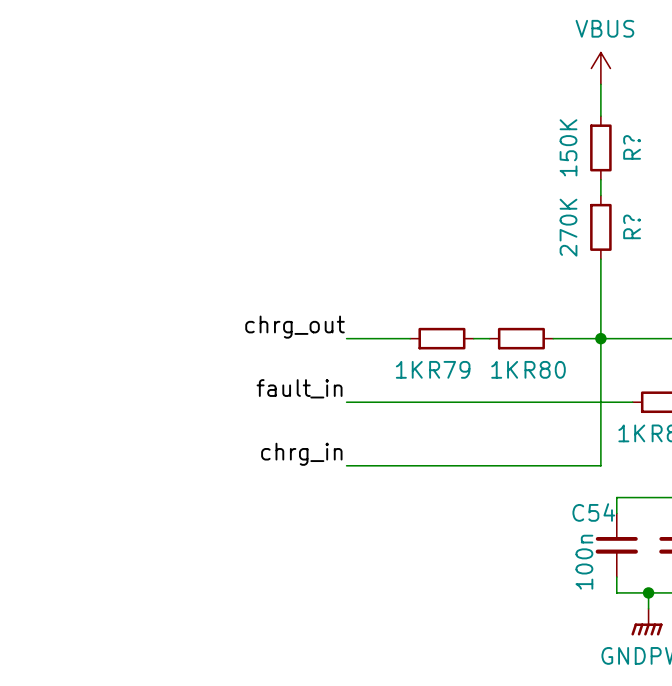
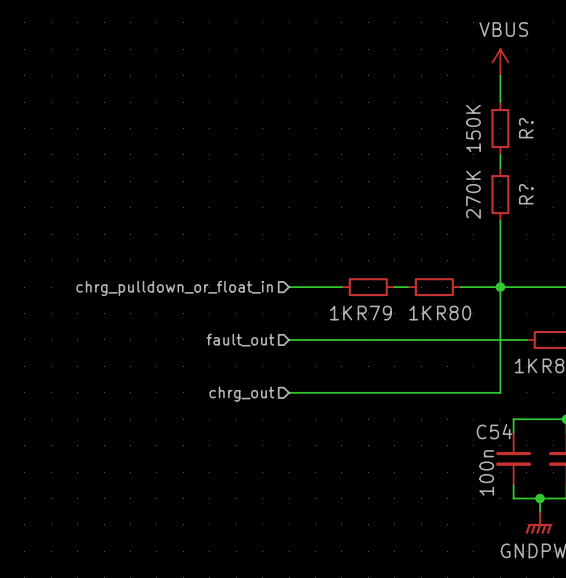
label: chrg_out (295, 327) -> none
hierarchical label: none -> chrg_pulldown_or_float_in (174, 288)
label: fault_in (299, 388) -> none
hierarchical label: none -> fault_out (240, 340)
label: chrg_in (301, 454) -> none
hierarchical label: none -> chrg_out (241, 394)

